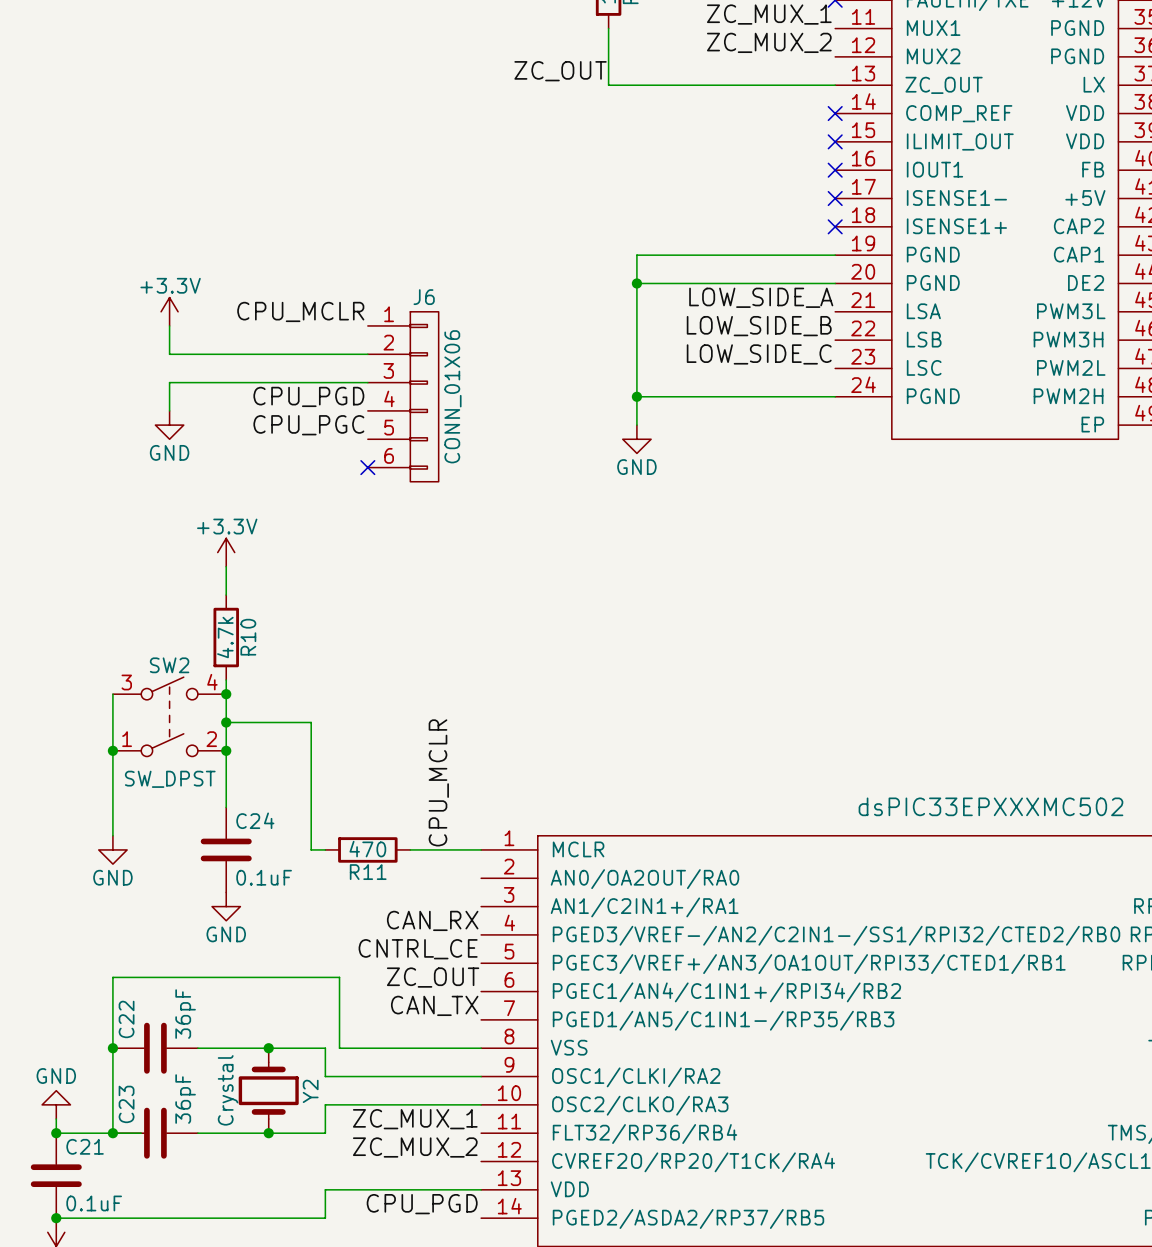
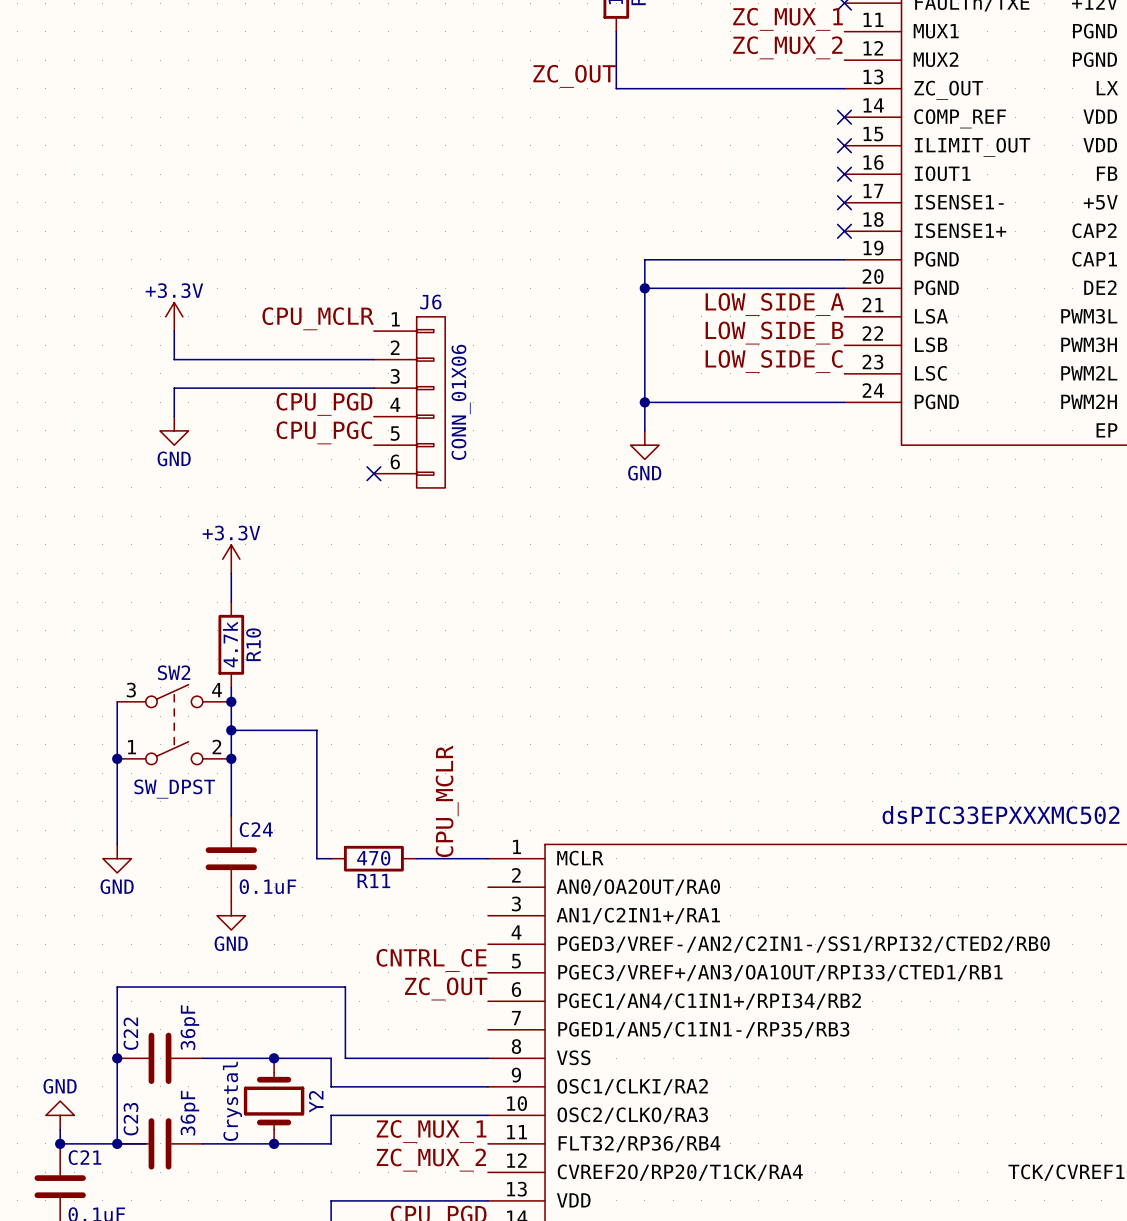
label: CAN_RX (432, 920) -> none
label: CAN_TX (434, 1005) -> none

